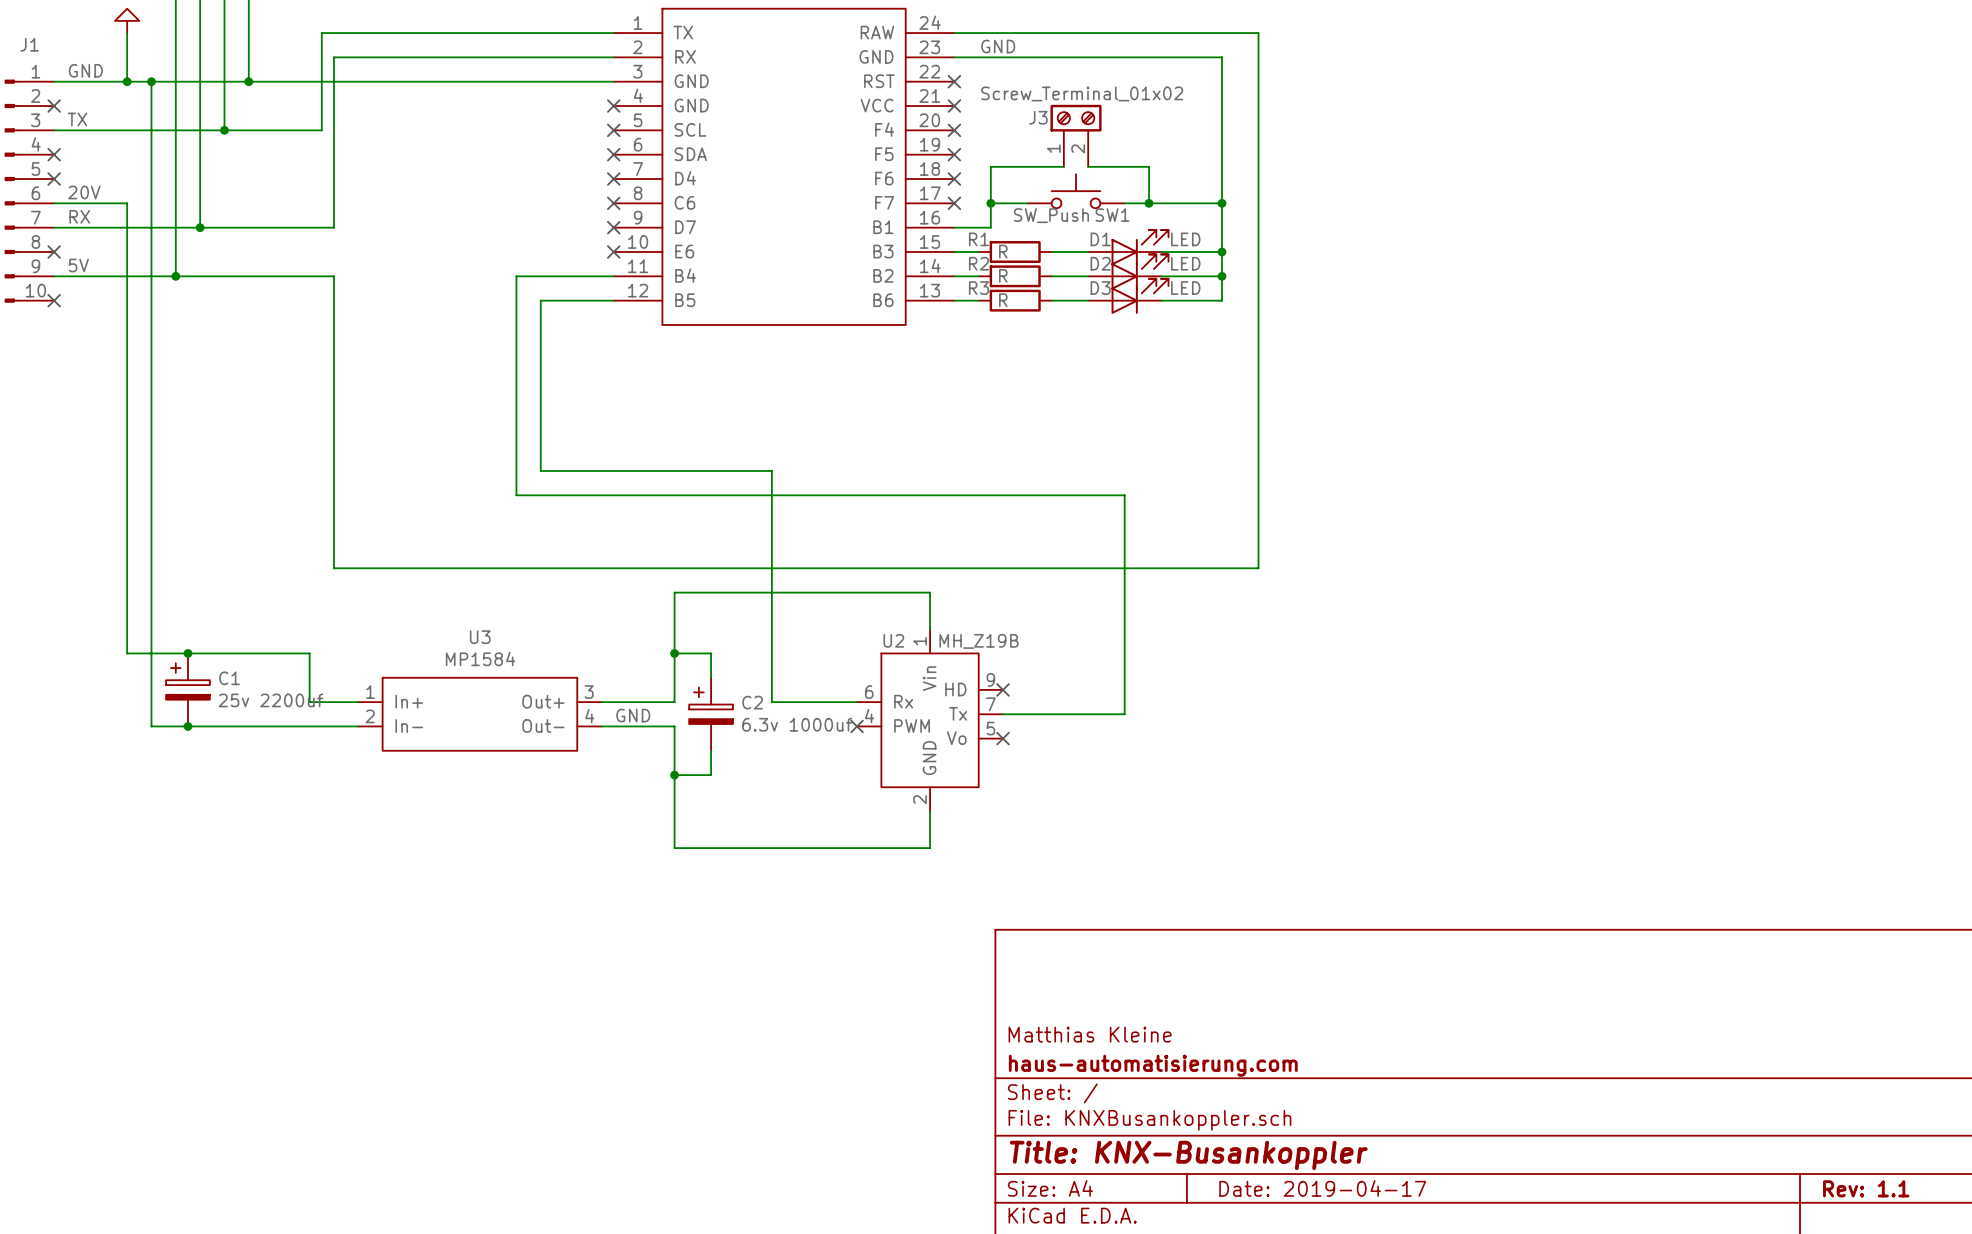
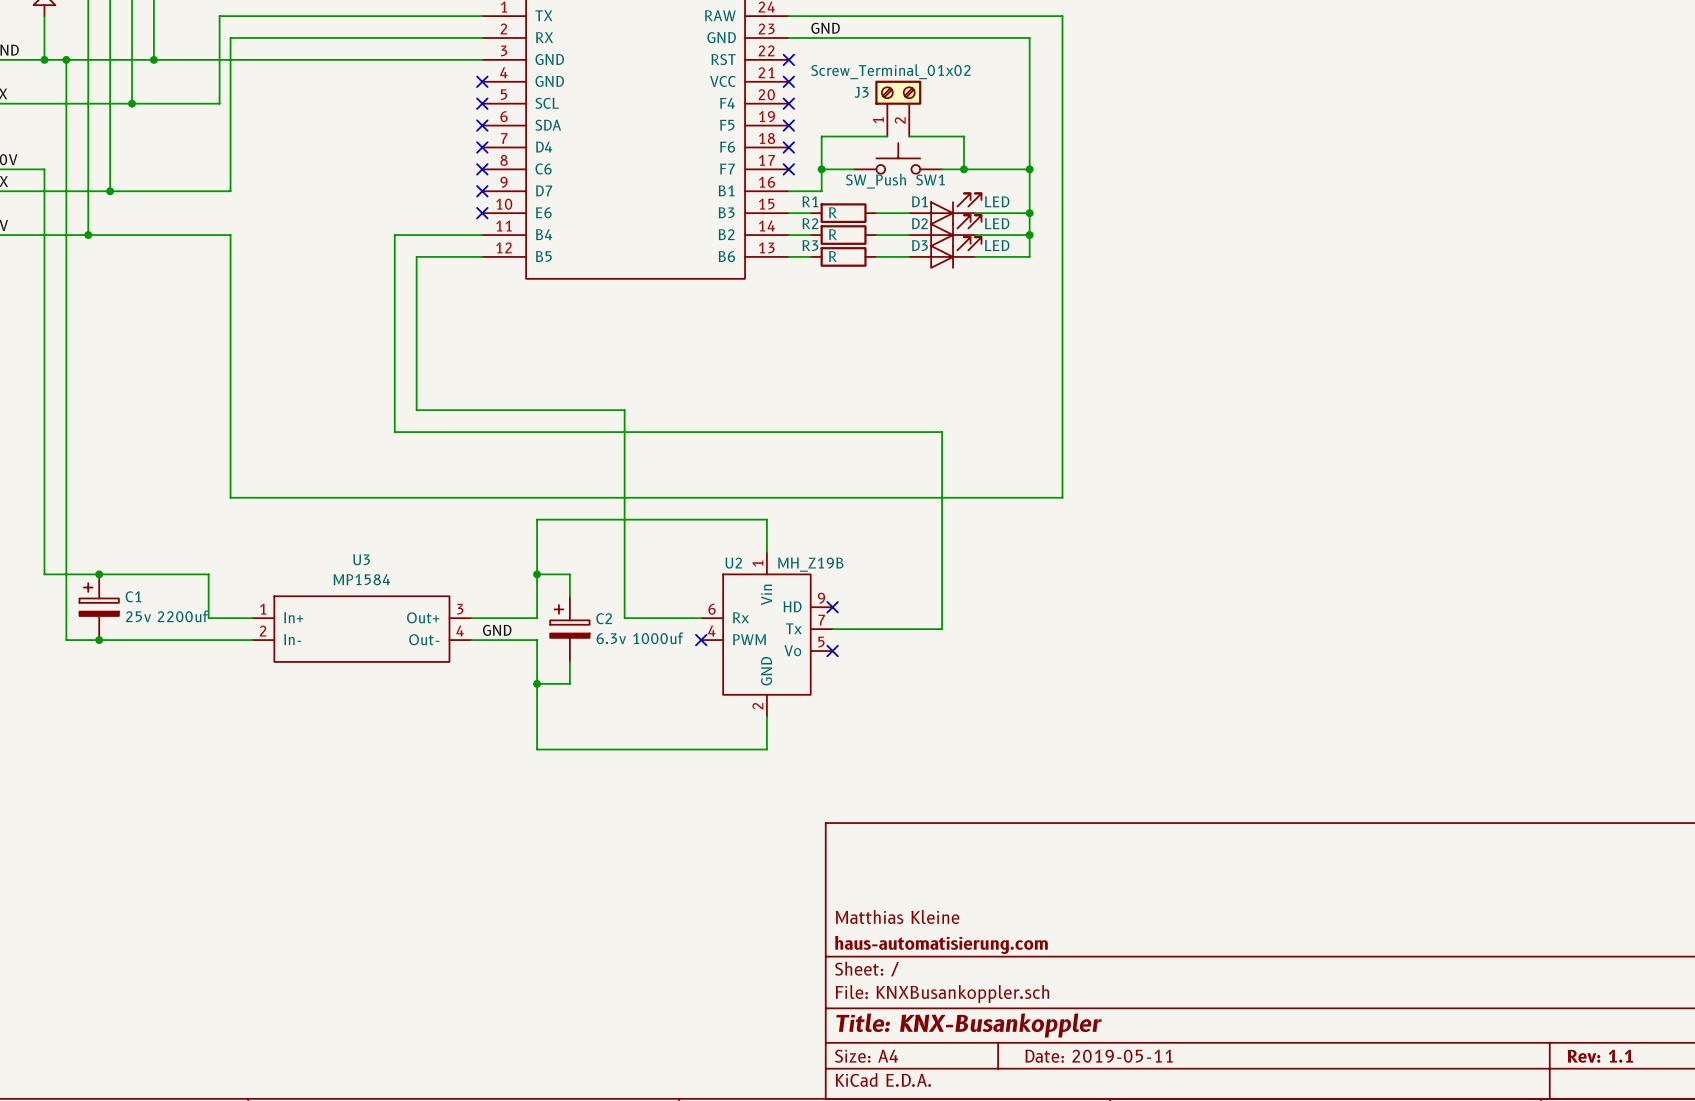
title block: Date: 2019-04-17 (1322, 1188) -> Date: 2019-05-11 (1099, 1056)

